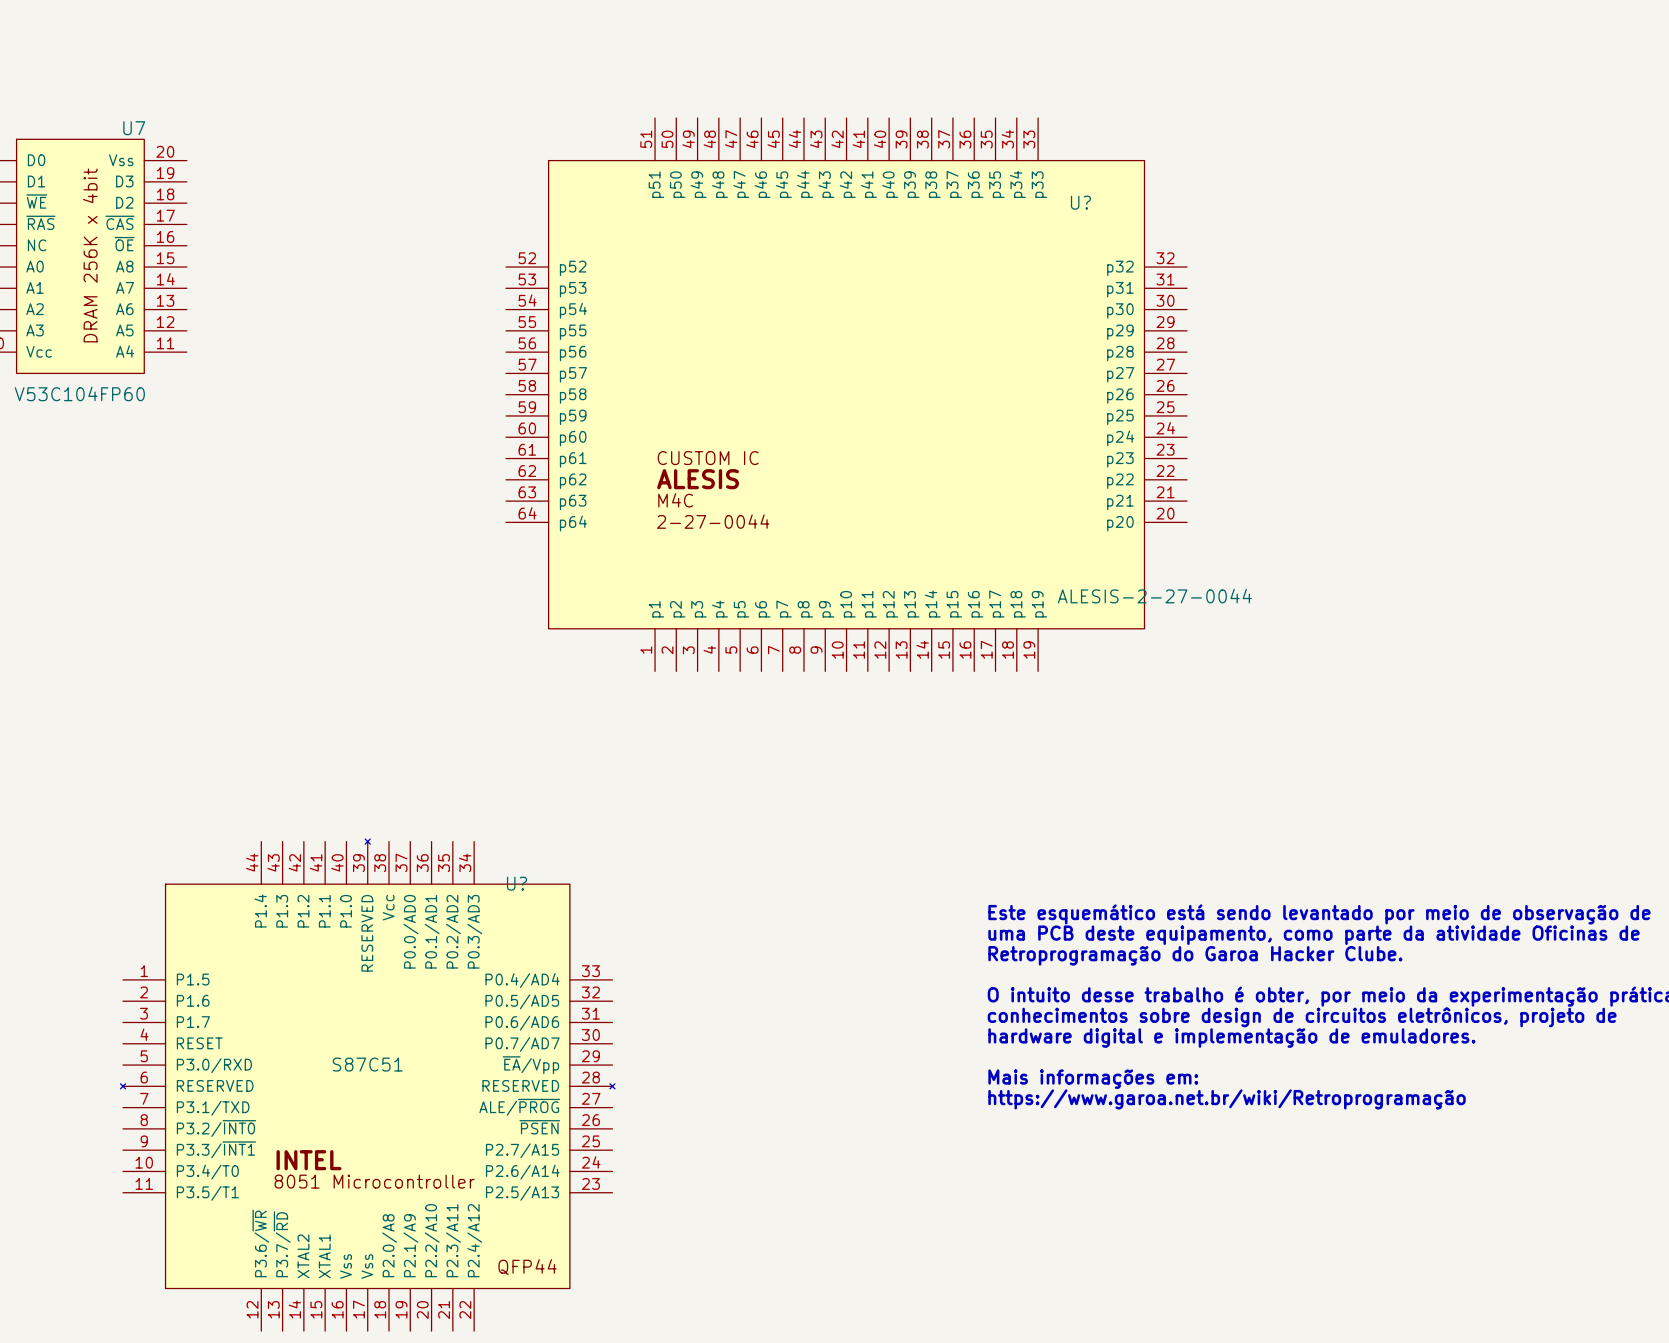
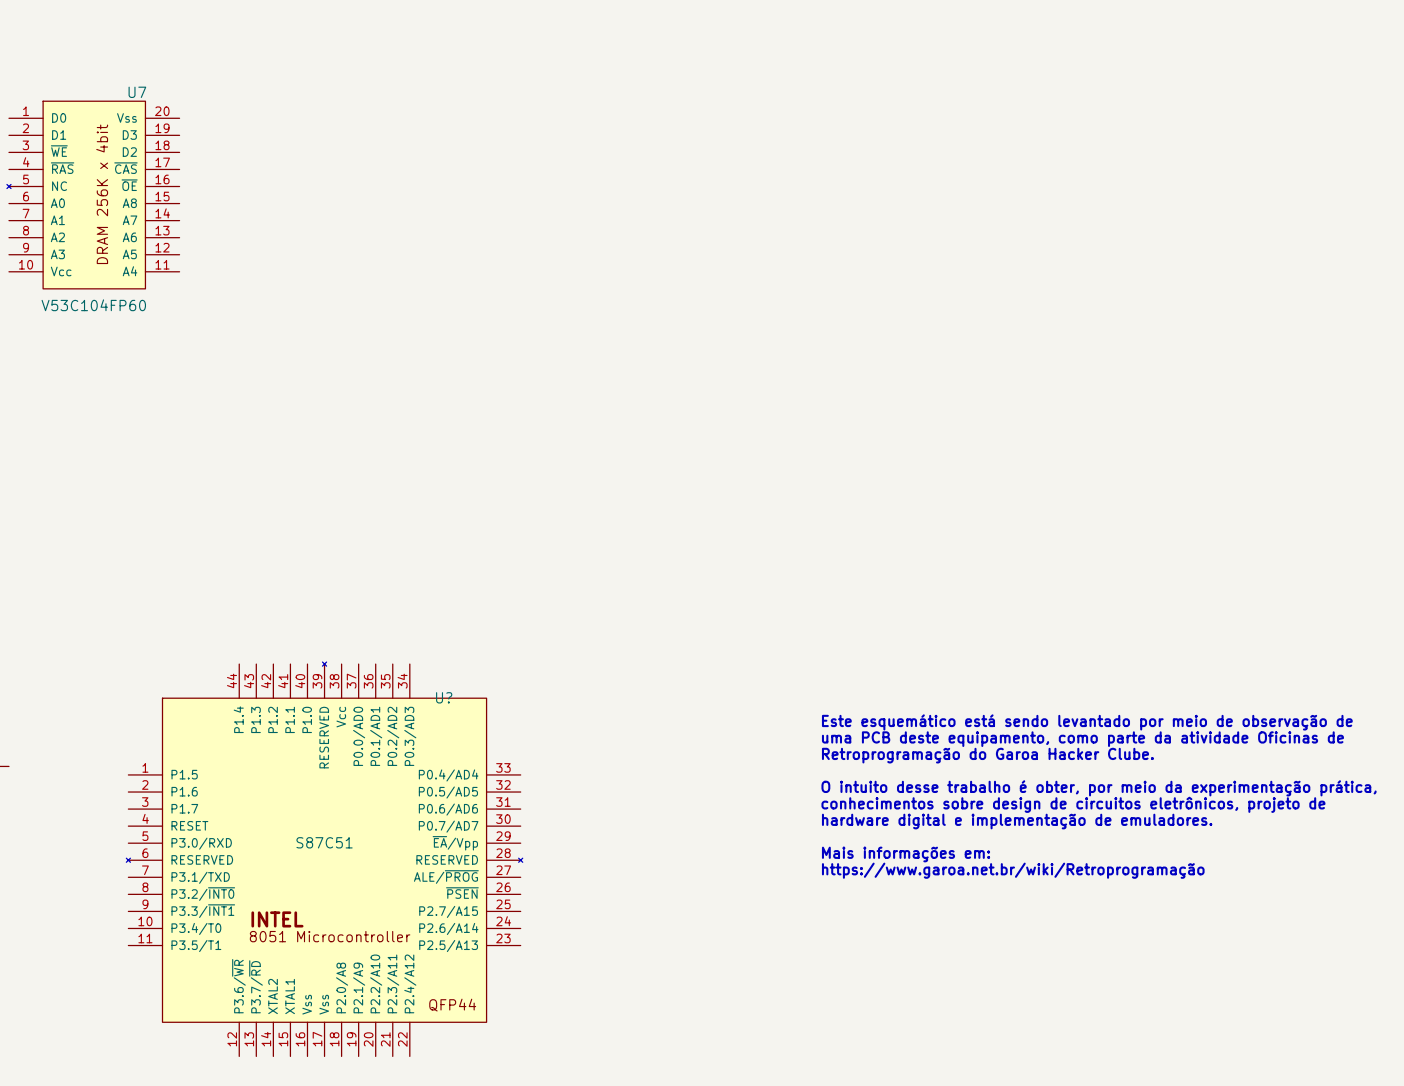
U?: ALESIS-2-27-0044 (846, 394) -> none

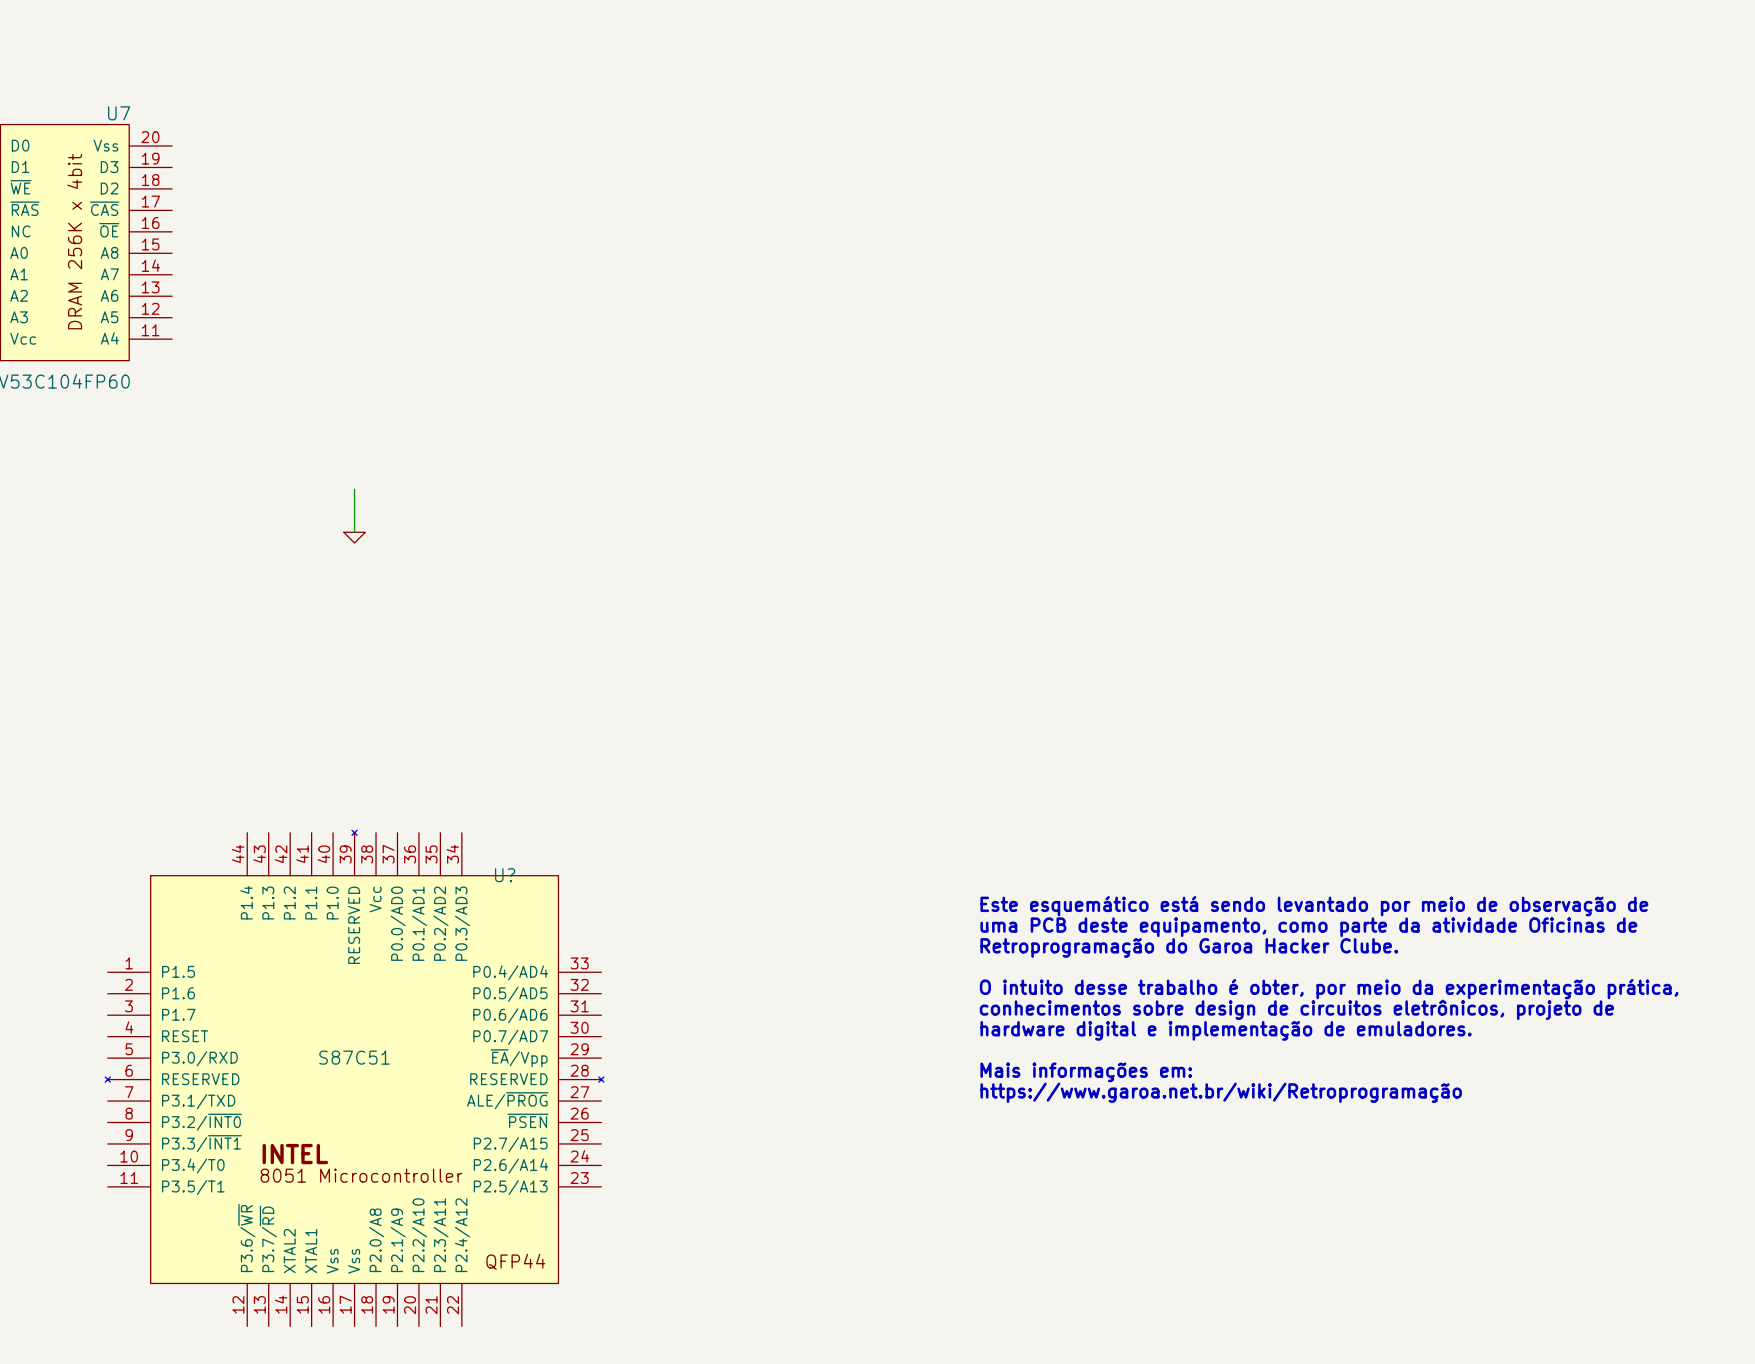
wire: none -> (354, 489) (354, 532)
power symbol: none -> (354, 537)

